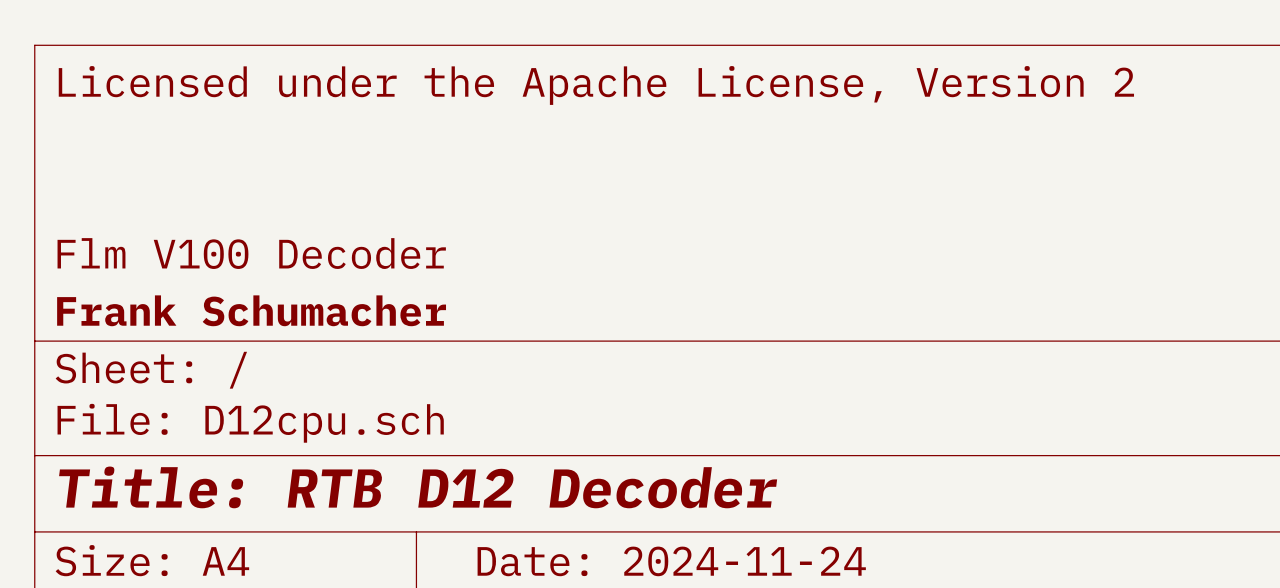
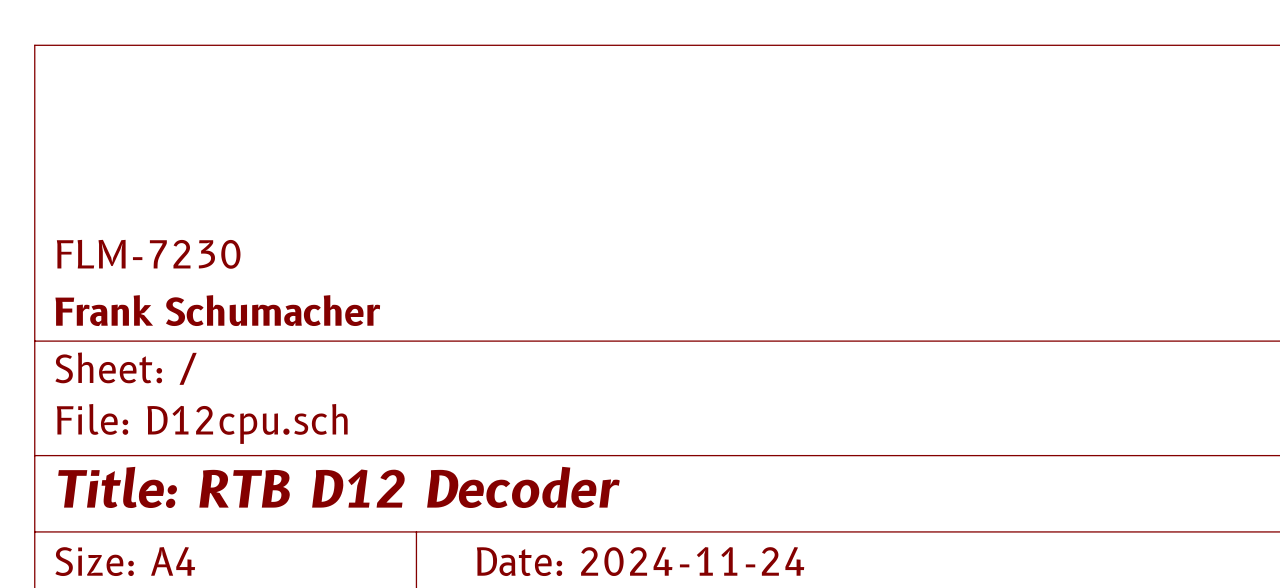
title block: Licensed under the Apache License, Version 2 (596, 85) -> none
title block: Flm V100 Decoder (251, 253) -> FLM-7230 (148, 254)

